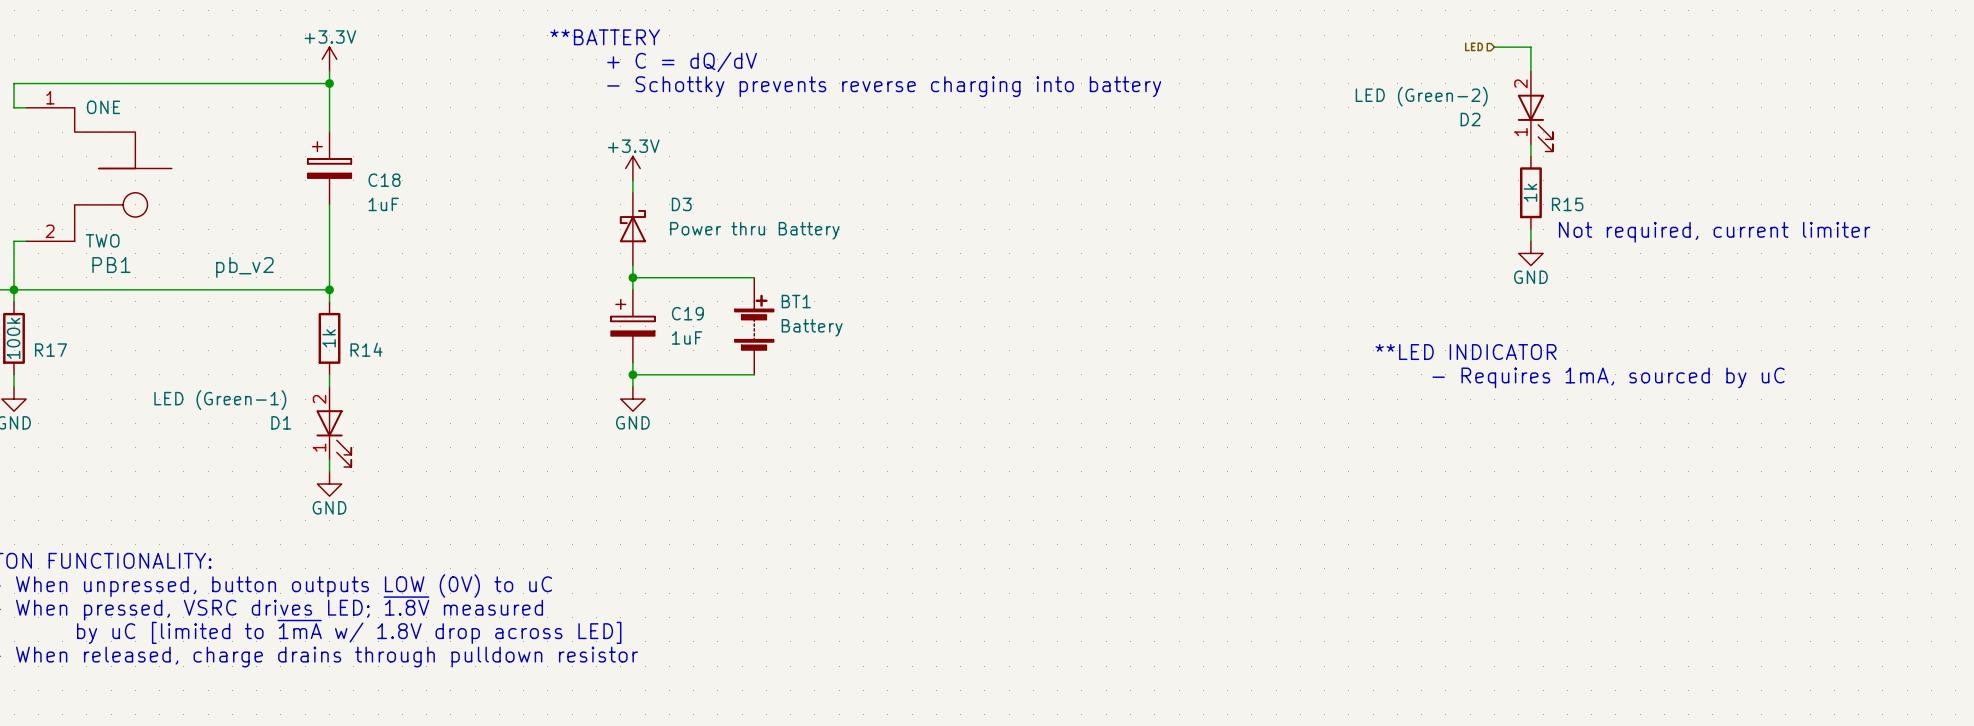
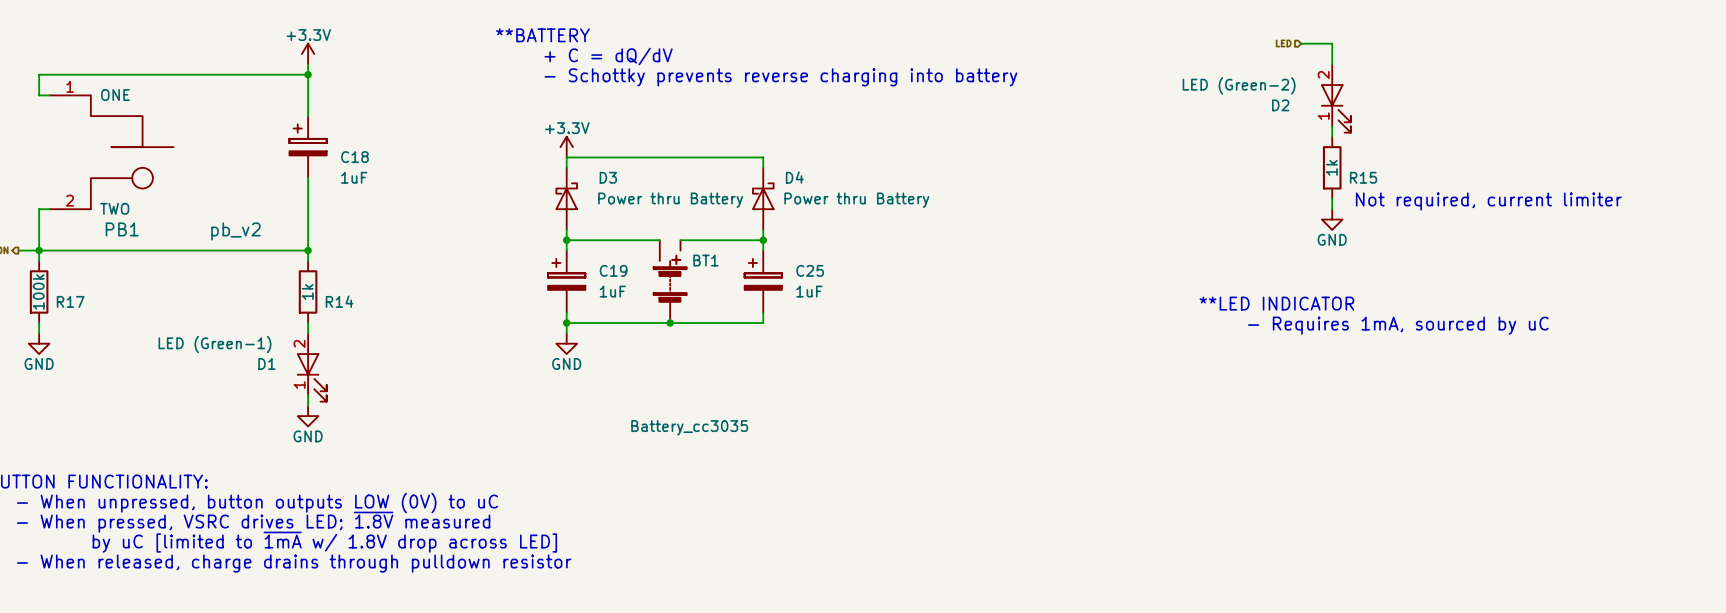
wire: none -> (566, 157) (763, 157) (763, 167)
D4: none -> Power thru Battery (763, 198)
wire: none -> (763, 229) (763, 250)
BT1 symbol: [734, 277, 774, 375] -> [653, 240, 687, 324]
wire: (742, 277) (754, 277) -> none
wire: none -> (680, 240) (763, 240)
junction: none -> (763, 240)
C25: none -> 1uF (763, 281)
BT1 value: Battery (812, 327) -> Battery_cc3035 (689, 427)
wire: none -> (763, 312) (763, 323) (670, 323)
junction: none -> (670, 323)

